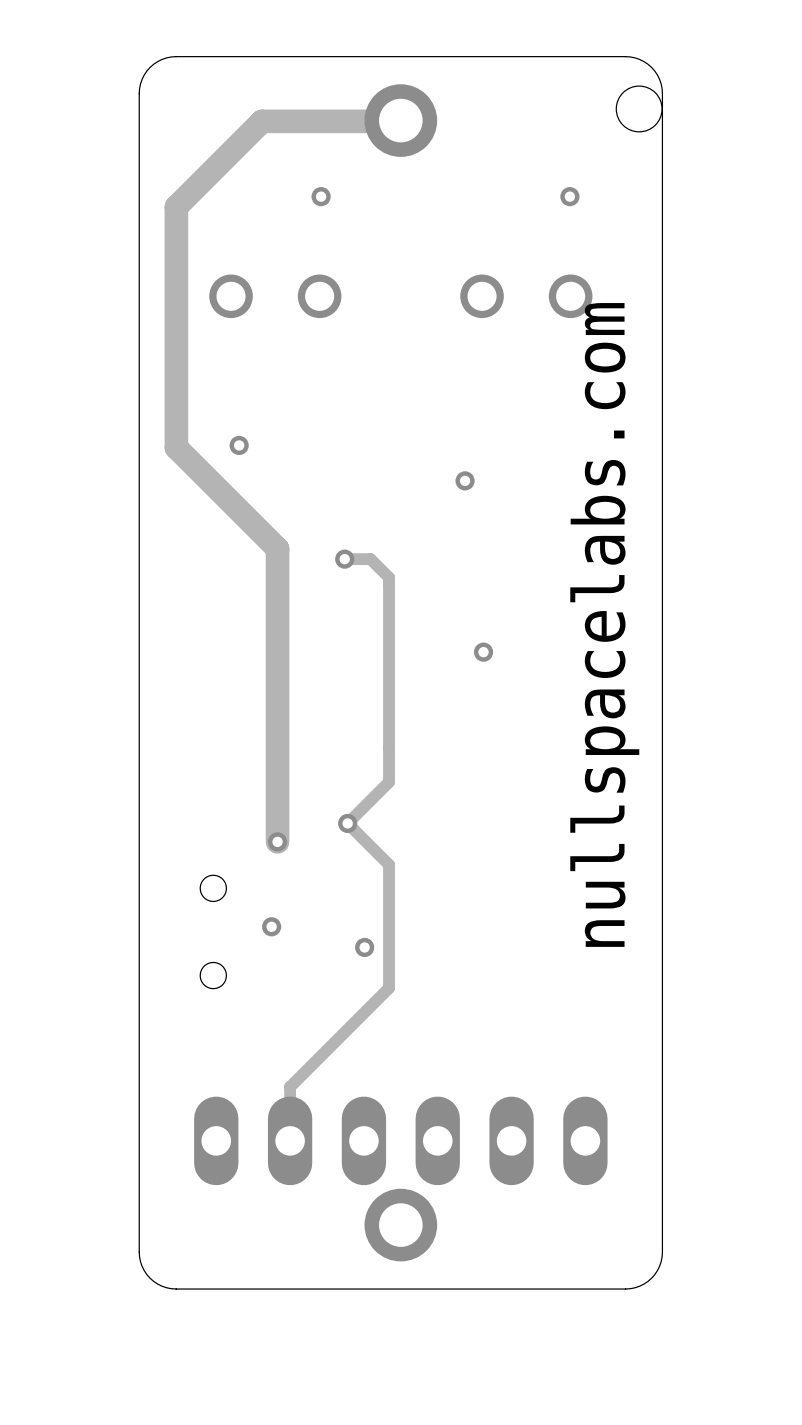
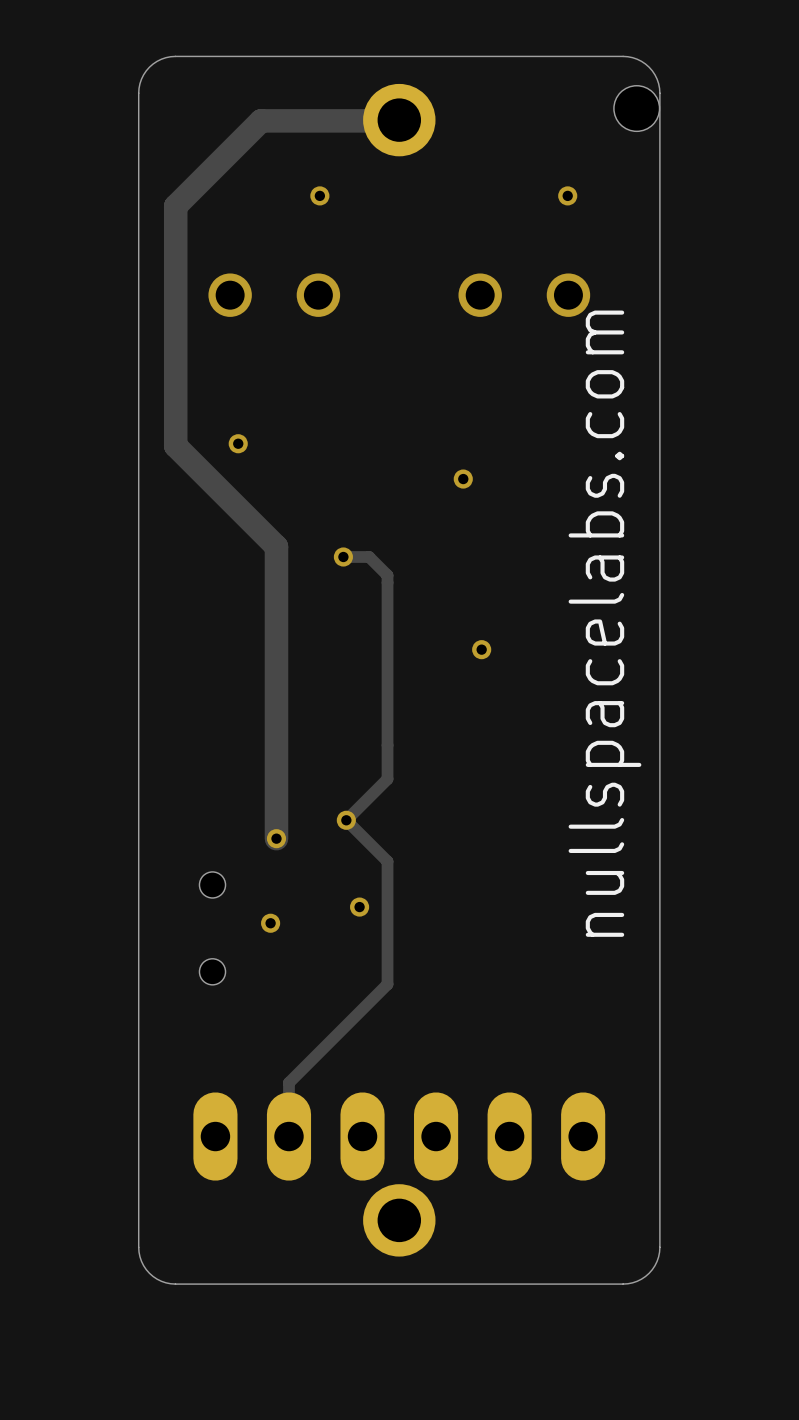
via position: (364, 947) -> (359, 907)

